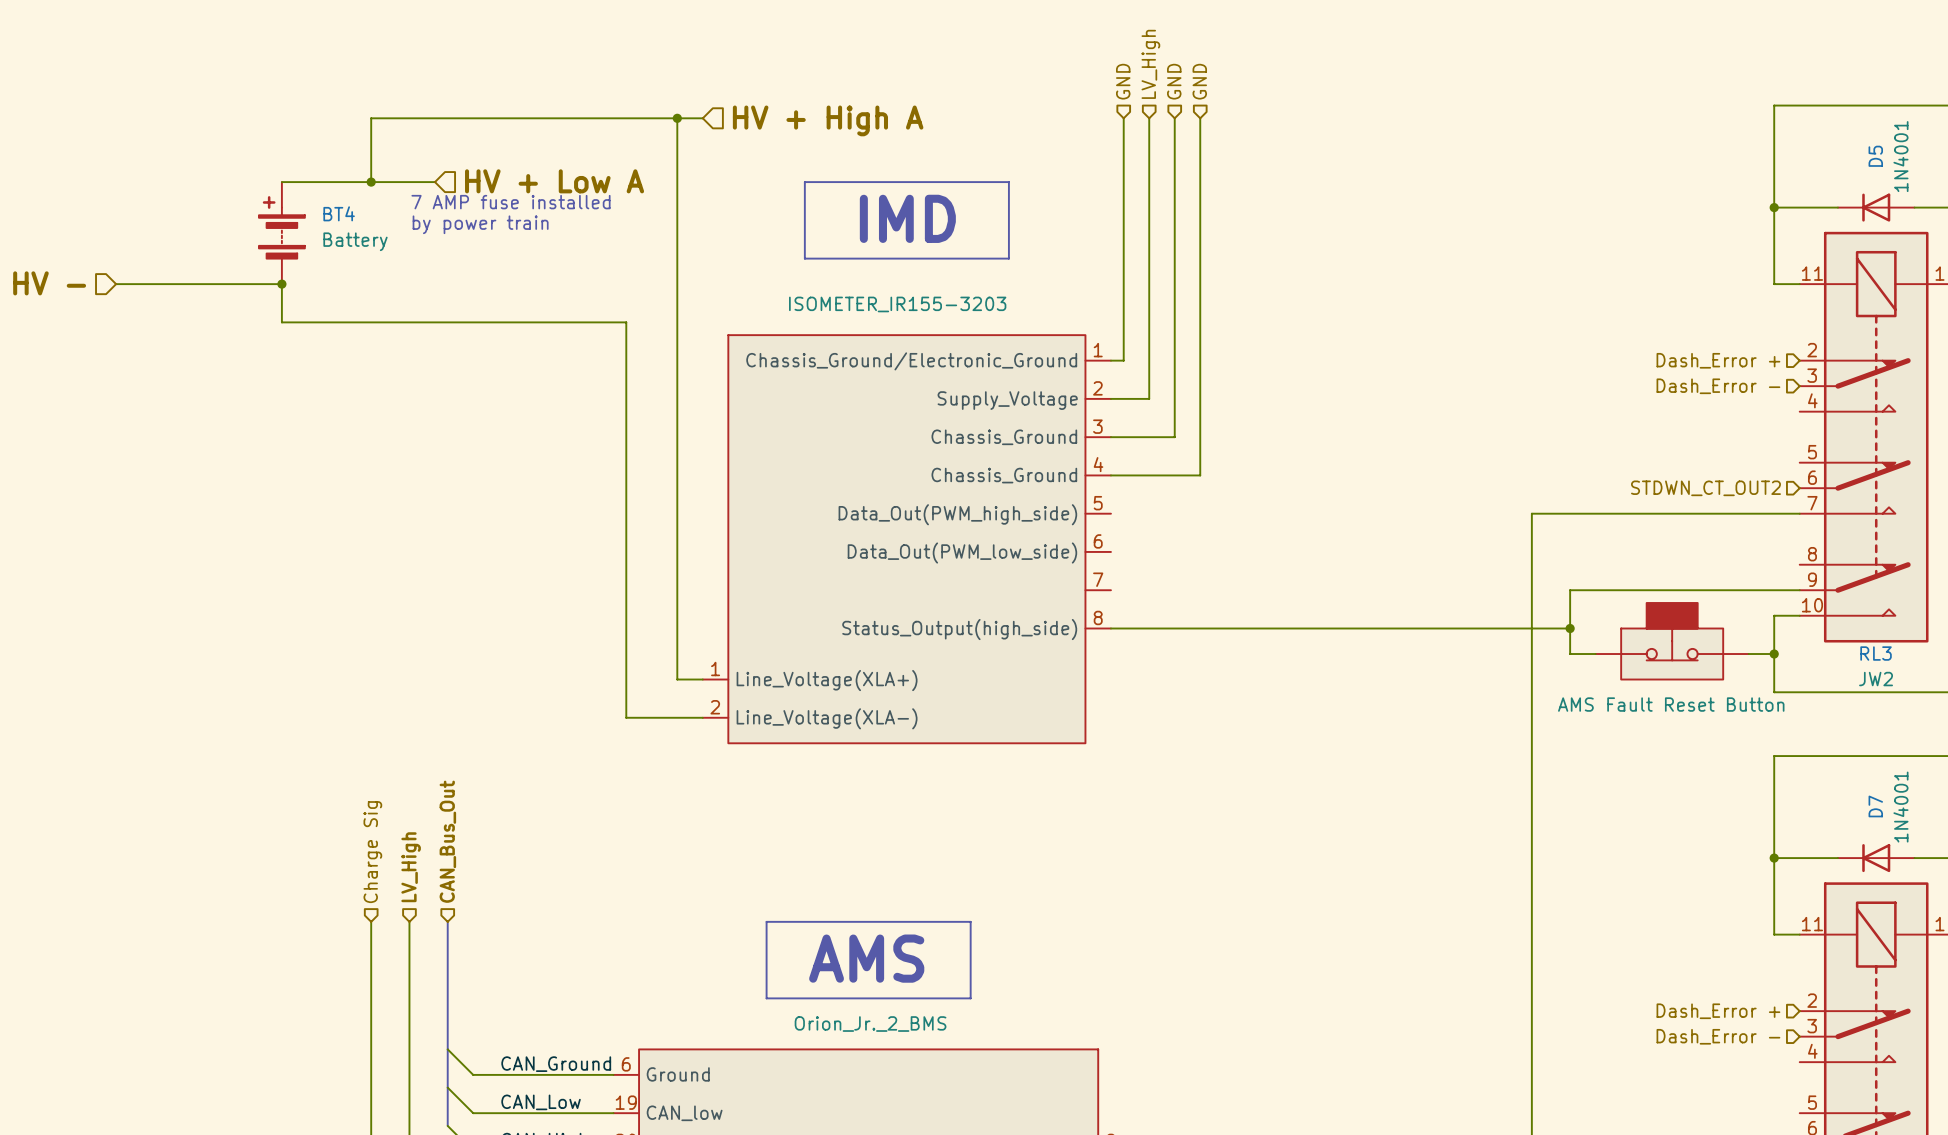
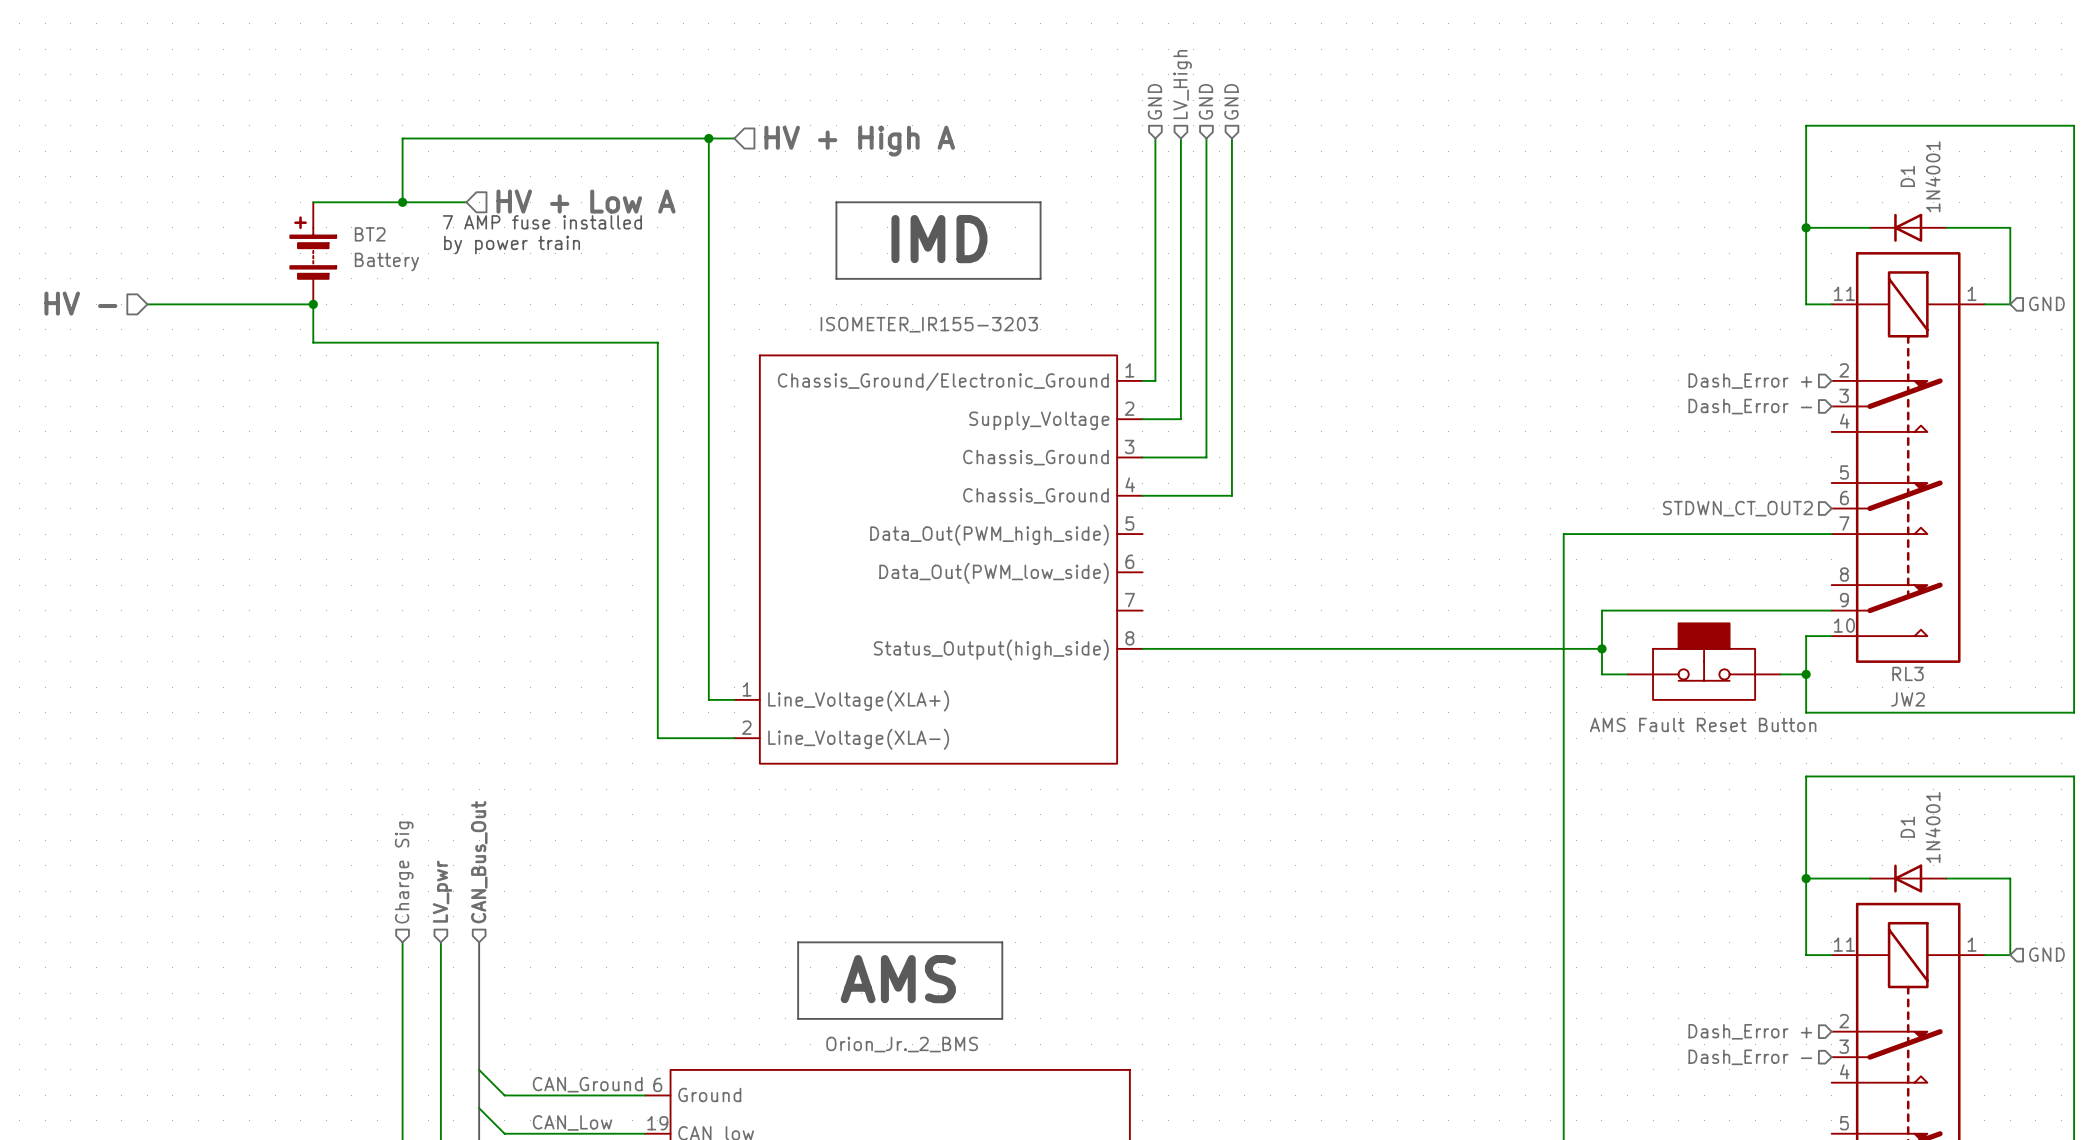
D5 name: D5 (1875, 156) -> D1 (1907, 176)
BT4 name: BT4 (339, 213) -> BT2 (370, 234)
D7 name: D7 (1875, 806) -> D1 (1907, 827)
hierarchical label: LV_High (411, 867) -> LV_pwr (442, 891)

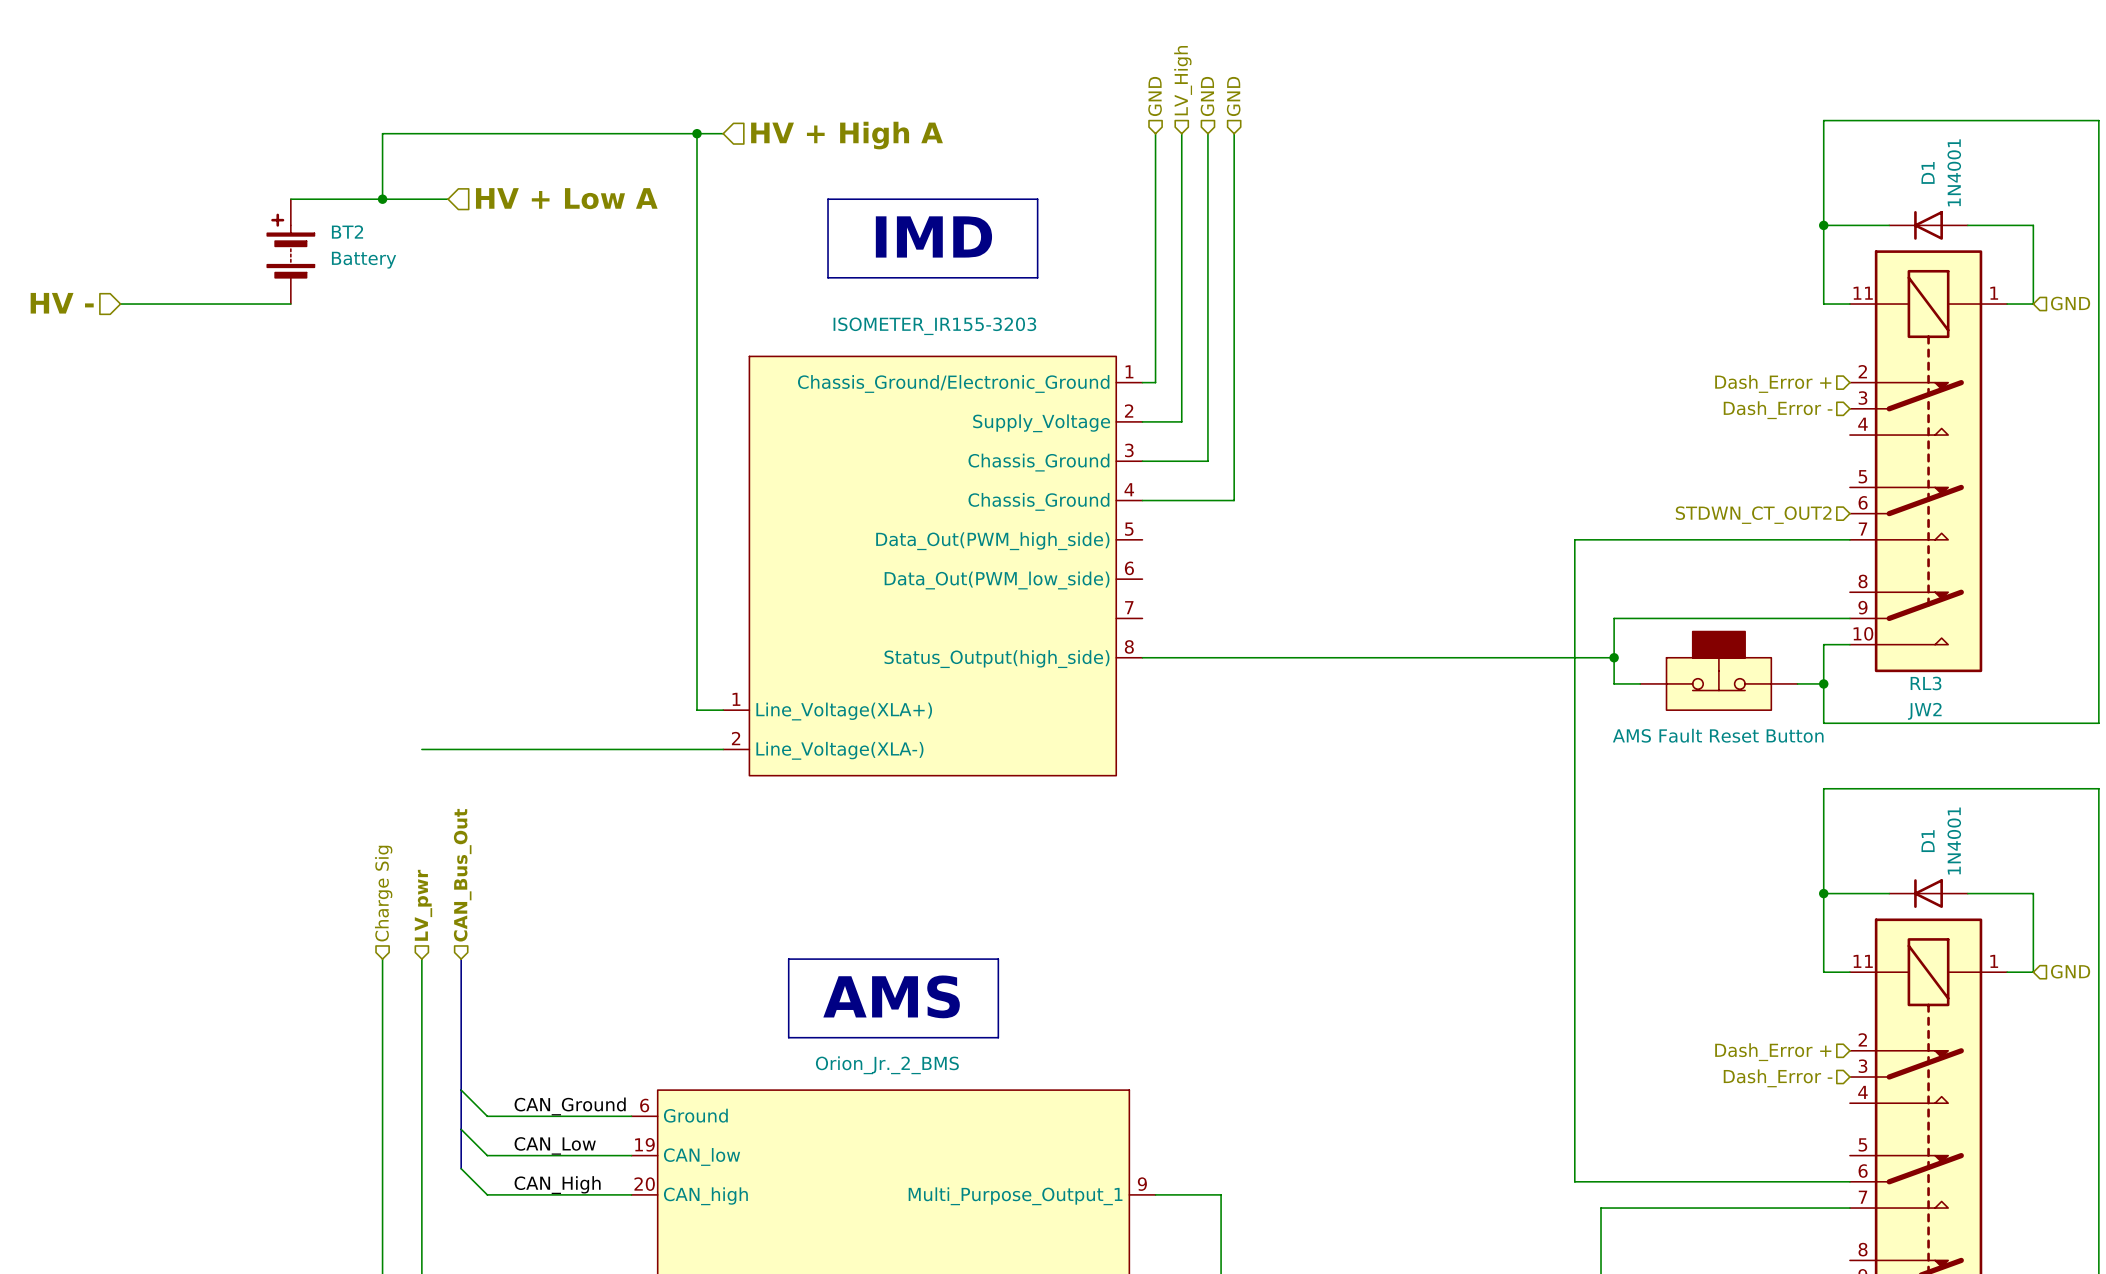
text: 7 AMP fuse installed (542, 222) -> none
text: by power train (512, 245) -> none
wire: (313, 304) (313, 342) (657, 342) (657, 738) -> (421, 749) (644, 749)
junction: (313, 304) -> none

